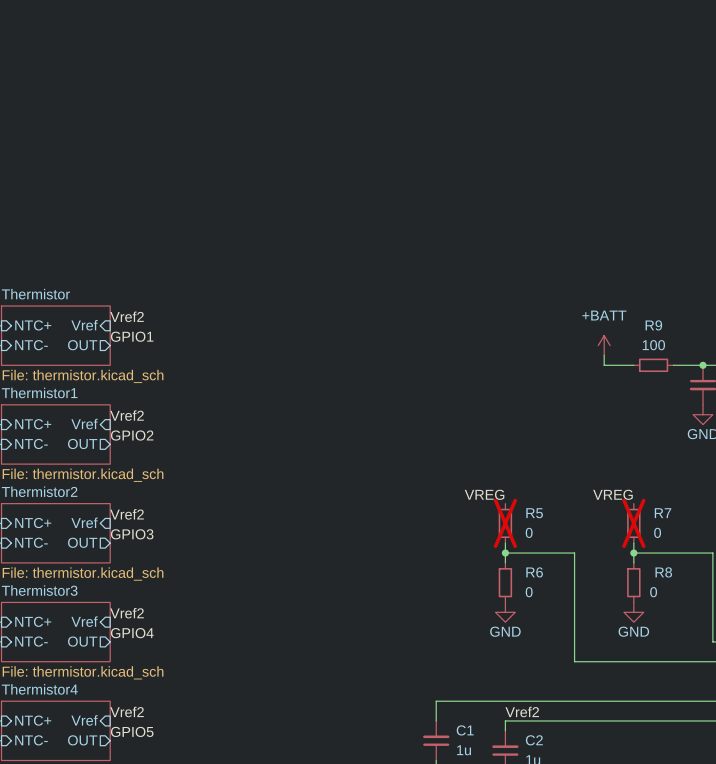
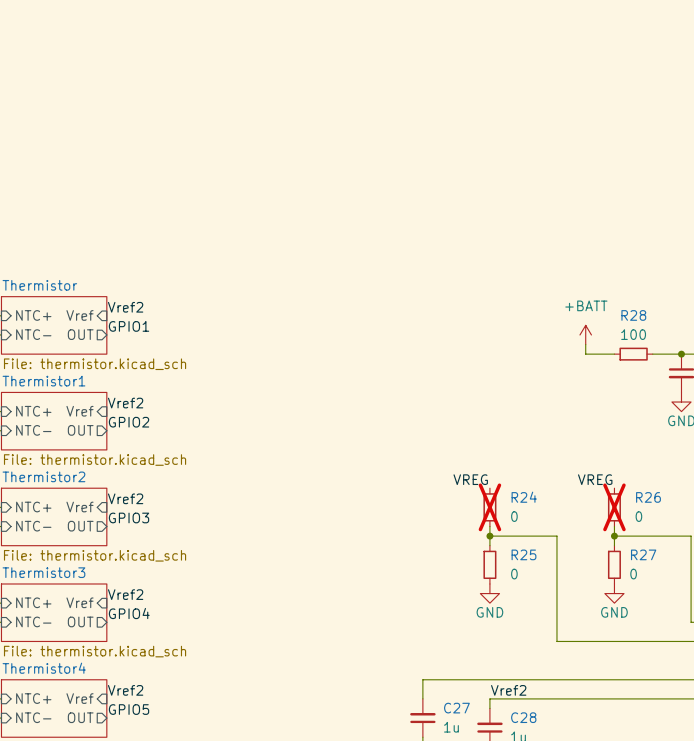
R9 name: R9 (653, 325) -> R28 (633, 315)
R5 name: R5 (534, 513) -> R24 (524, 497)
R7 name: R7 (663, 513) -> R26 (648, 497)
R6 name: R6 (534, 572) -> R25 (523, 554)
R8 name: R8 (663, 572) -> R27 (643, 554)
C1 name: C1 (465, 730) -> C27 (456, 708)
C2 name: C2 (534, 740) -> C28 (523, 717)

